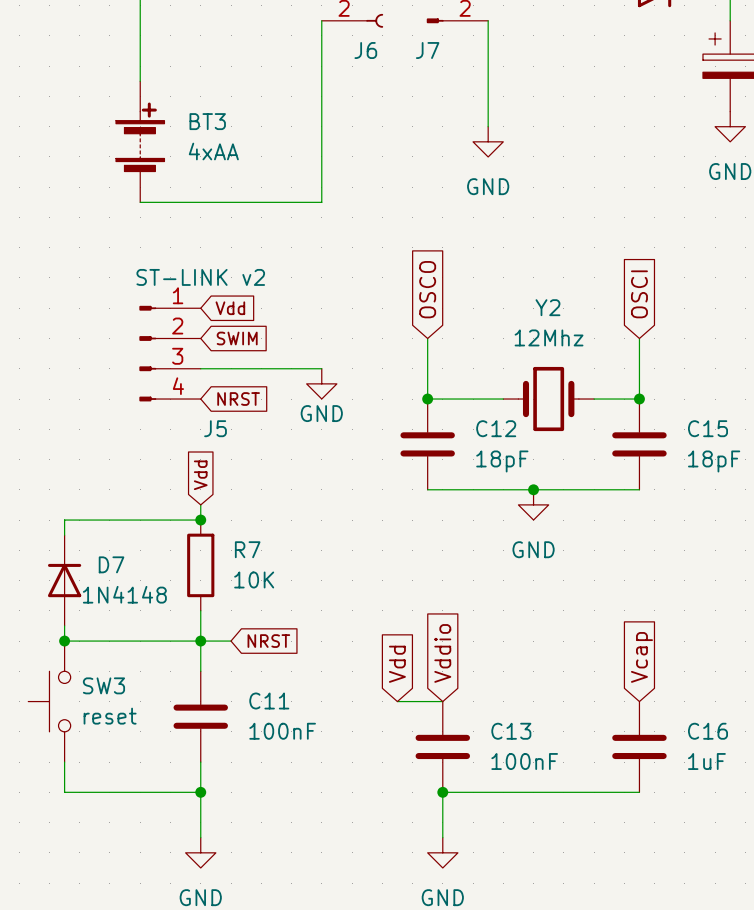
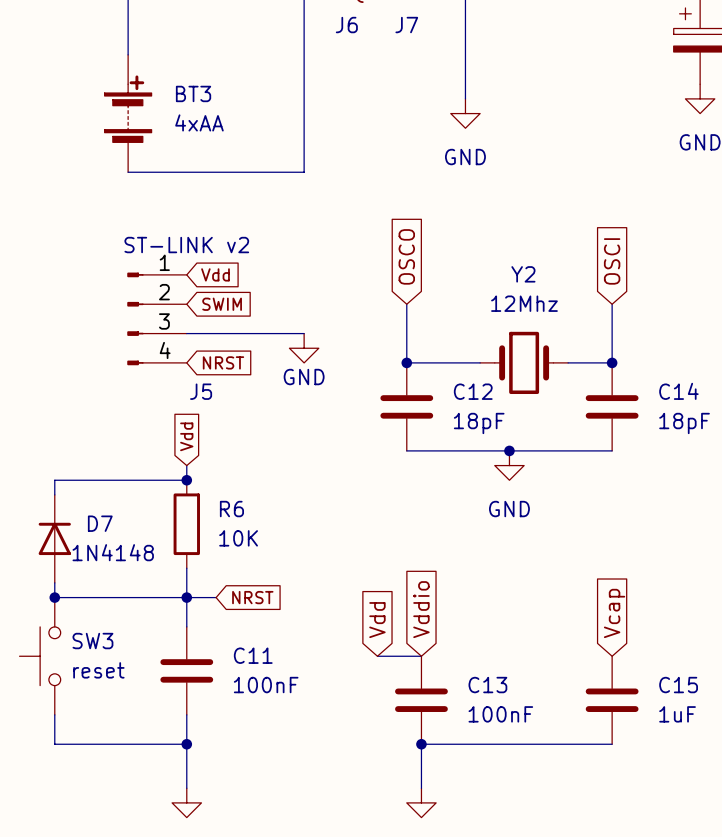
C15 name: C15 (708, 428) -> C14 (678, 391)
R7 name: R7 (247, 549) -> R6 (231, 509)
C16 name: C16 (708, 731) -> C15 (678, 685)

